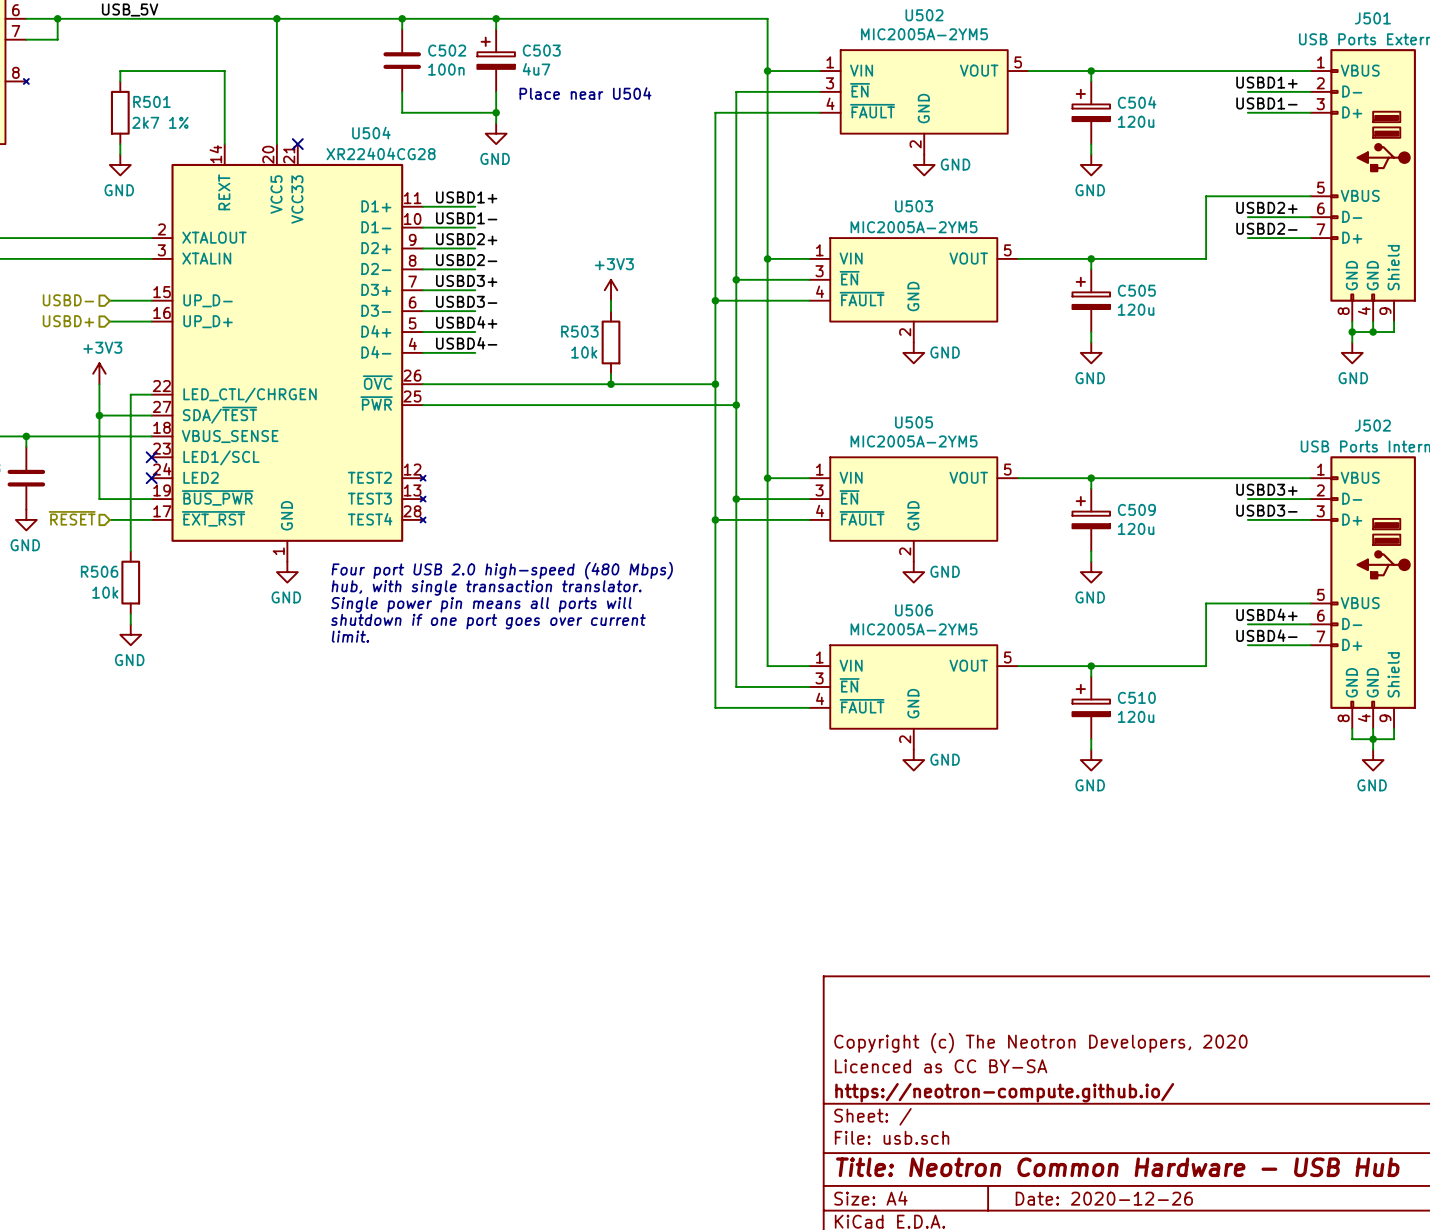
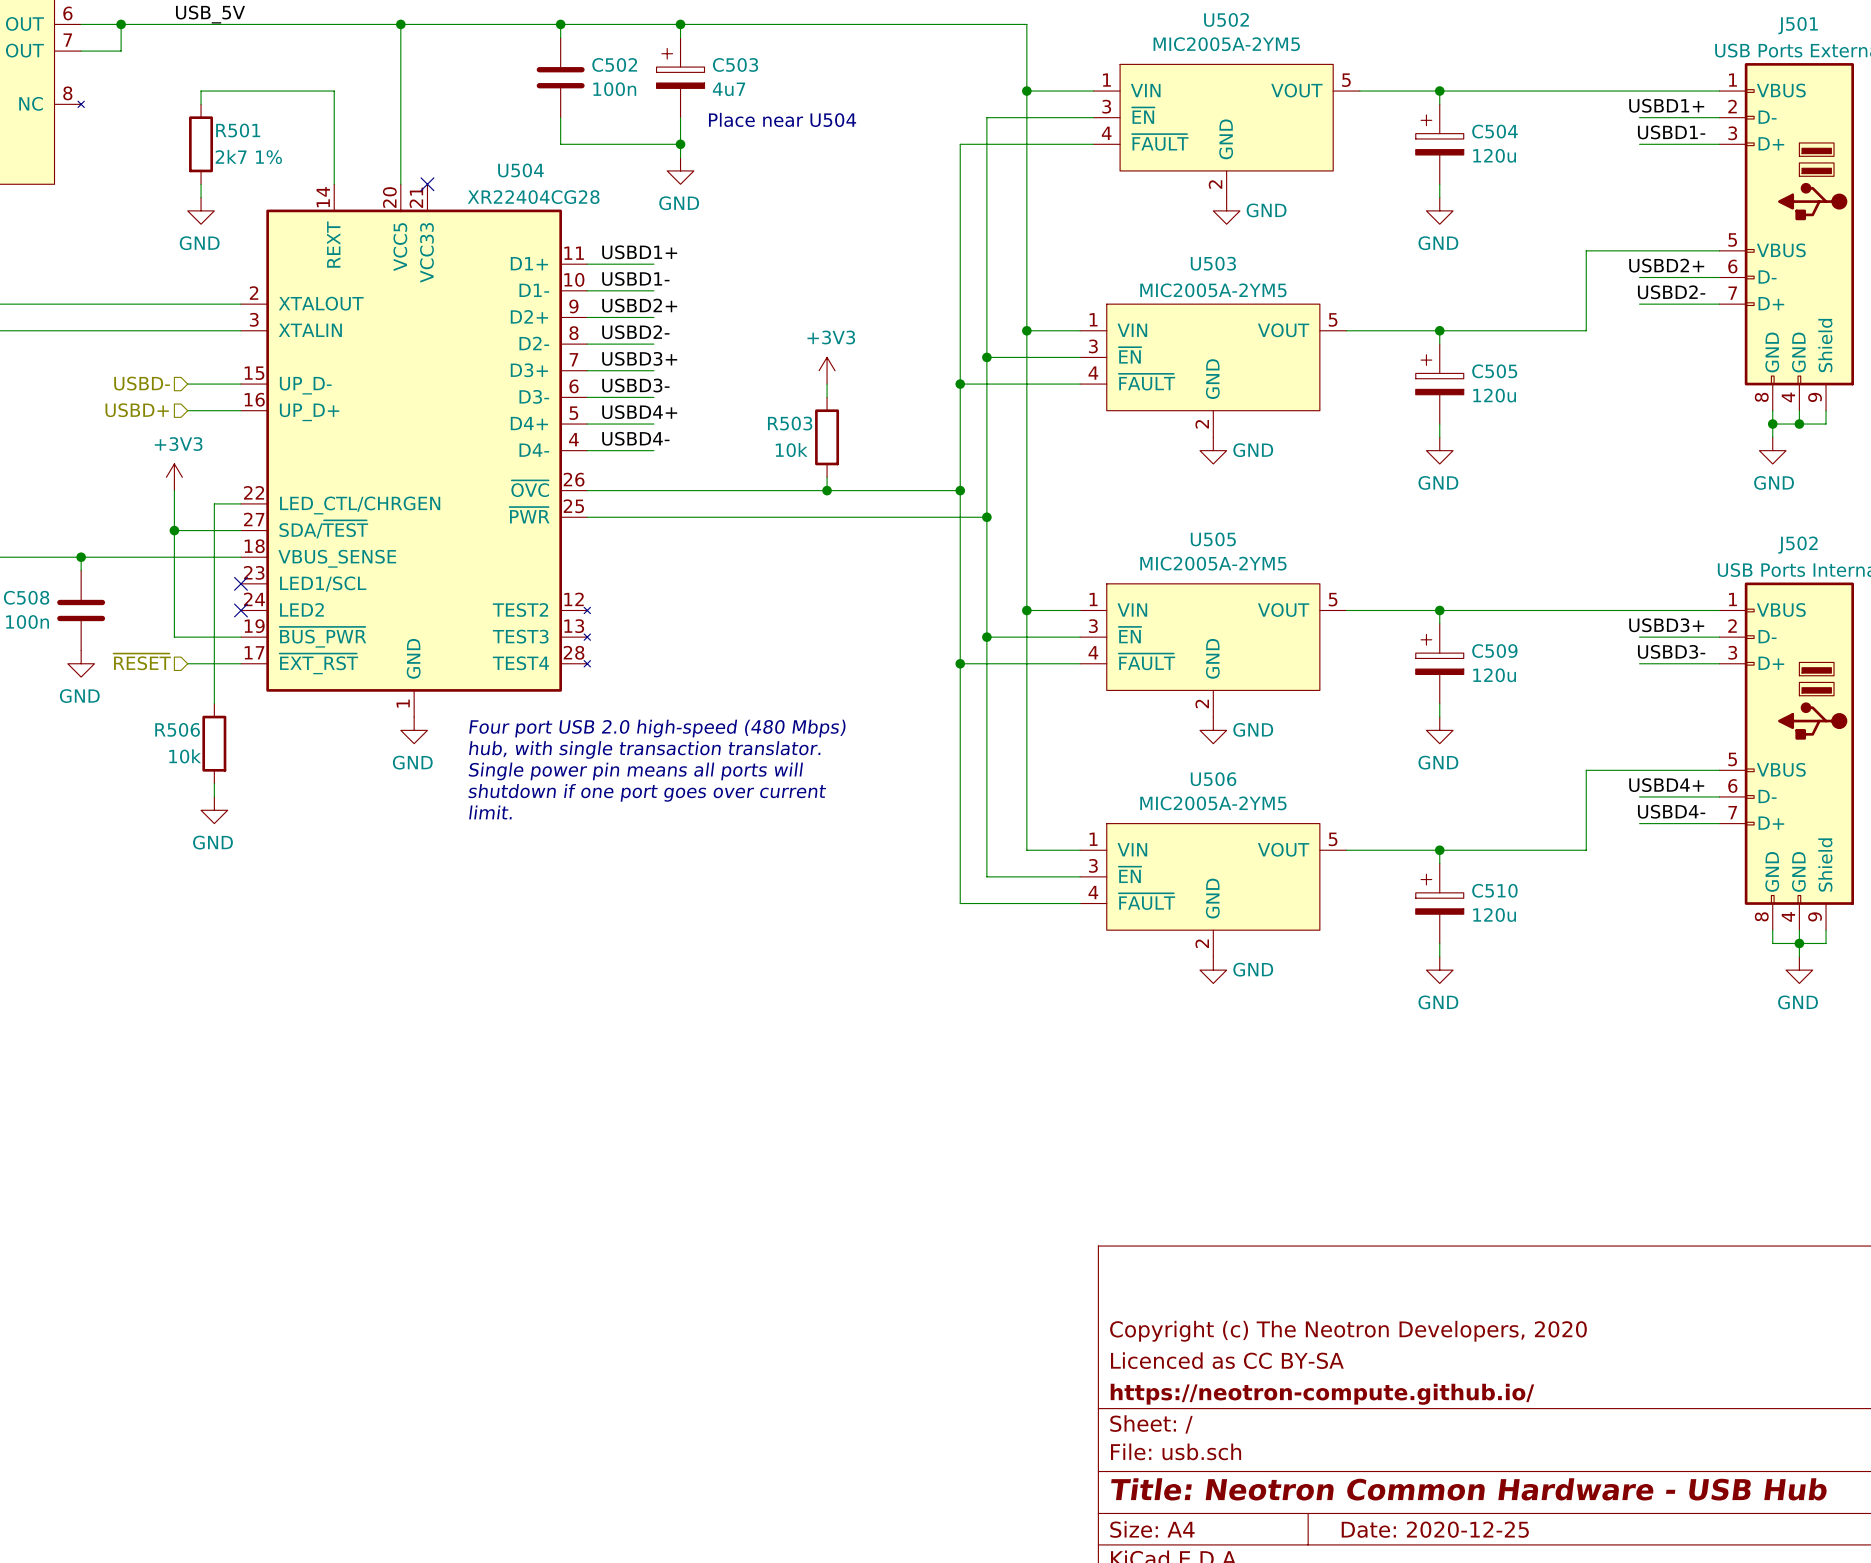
title block: Date: 2020-12-26 (1104, 1198) -> Date: 2020-12-25 (1435, 1529)

